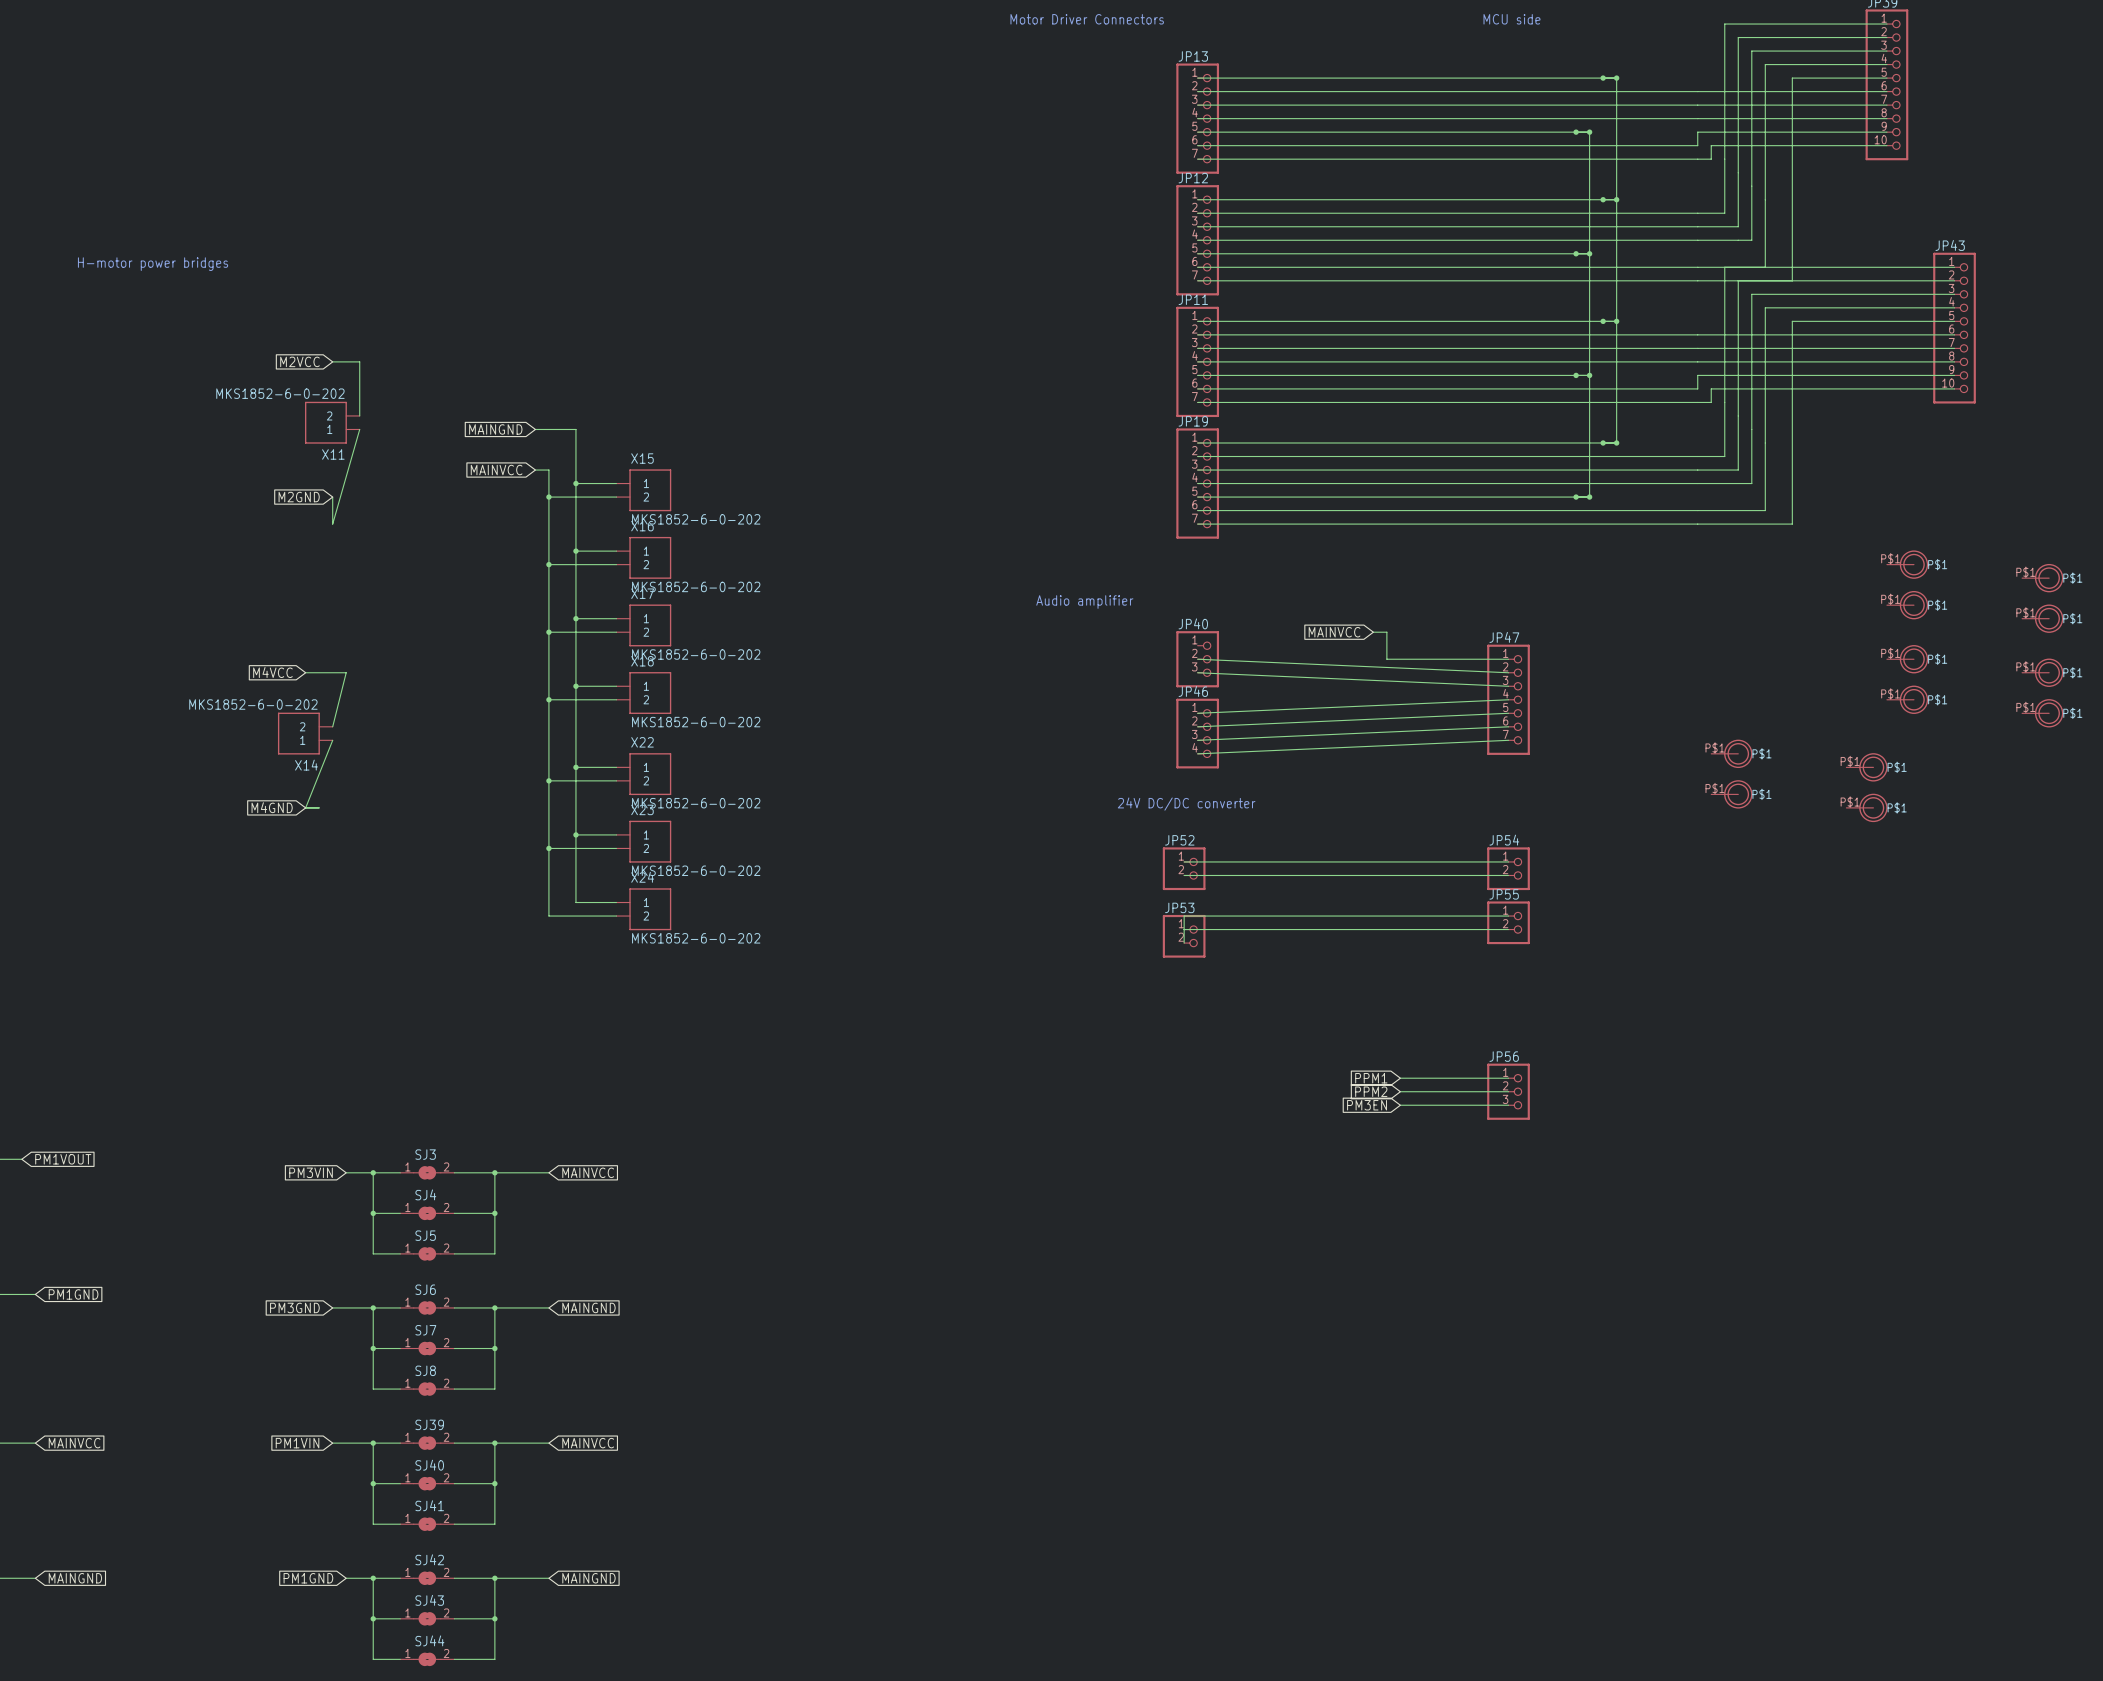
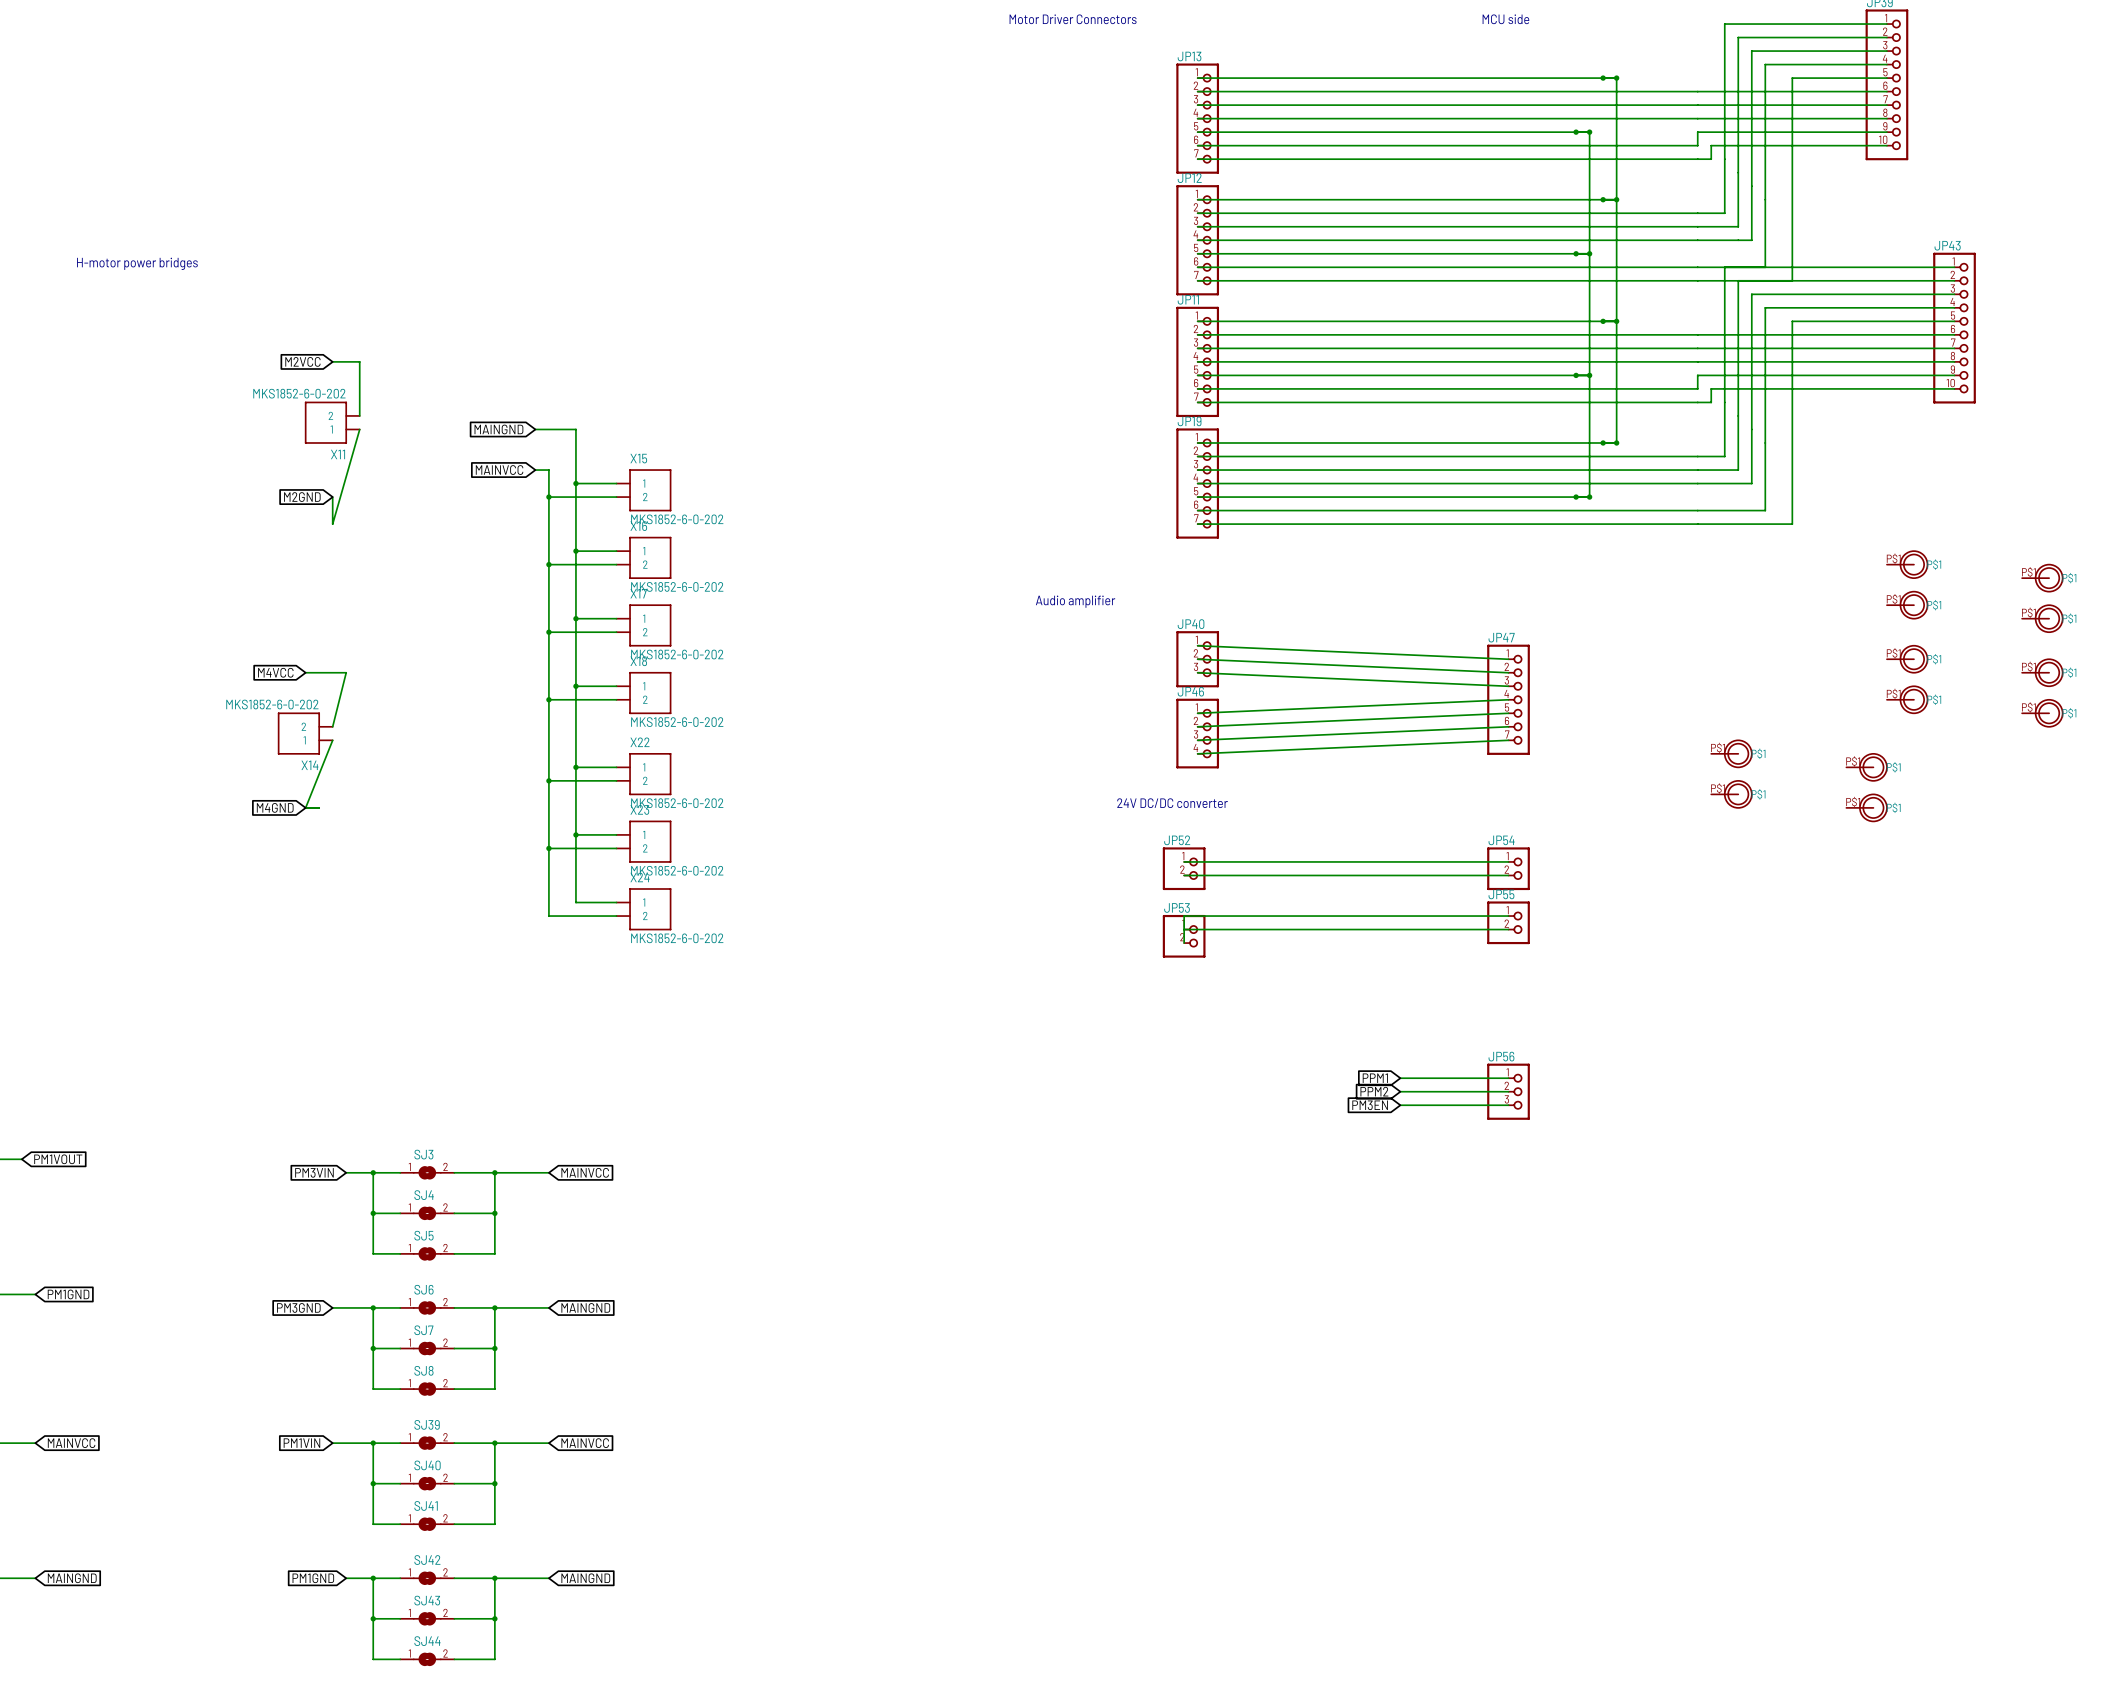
global label: MAINVCC (1334, 632) -> none
wire: (1373, 632) (1386, 632) (1386, 659) (1508, 659) -> (1197, 645) (1508, 659)

